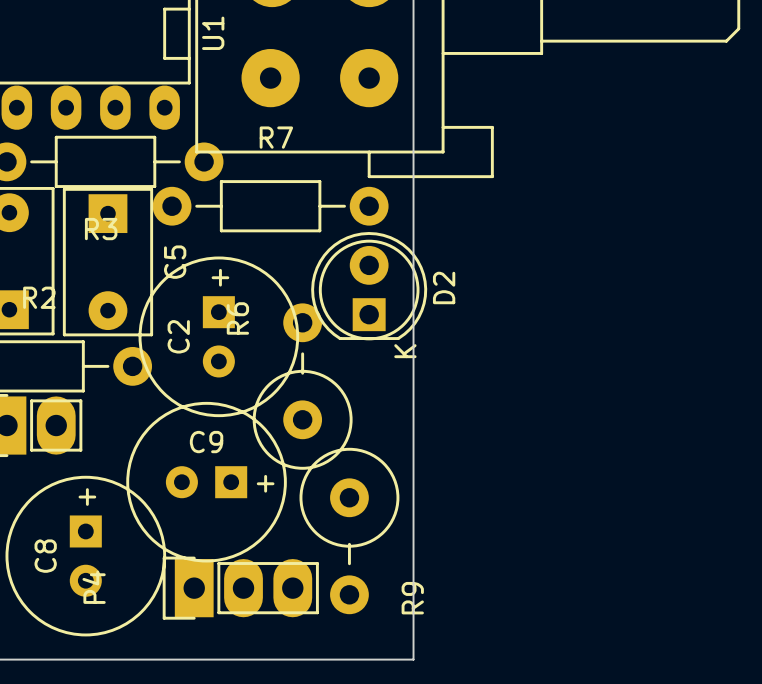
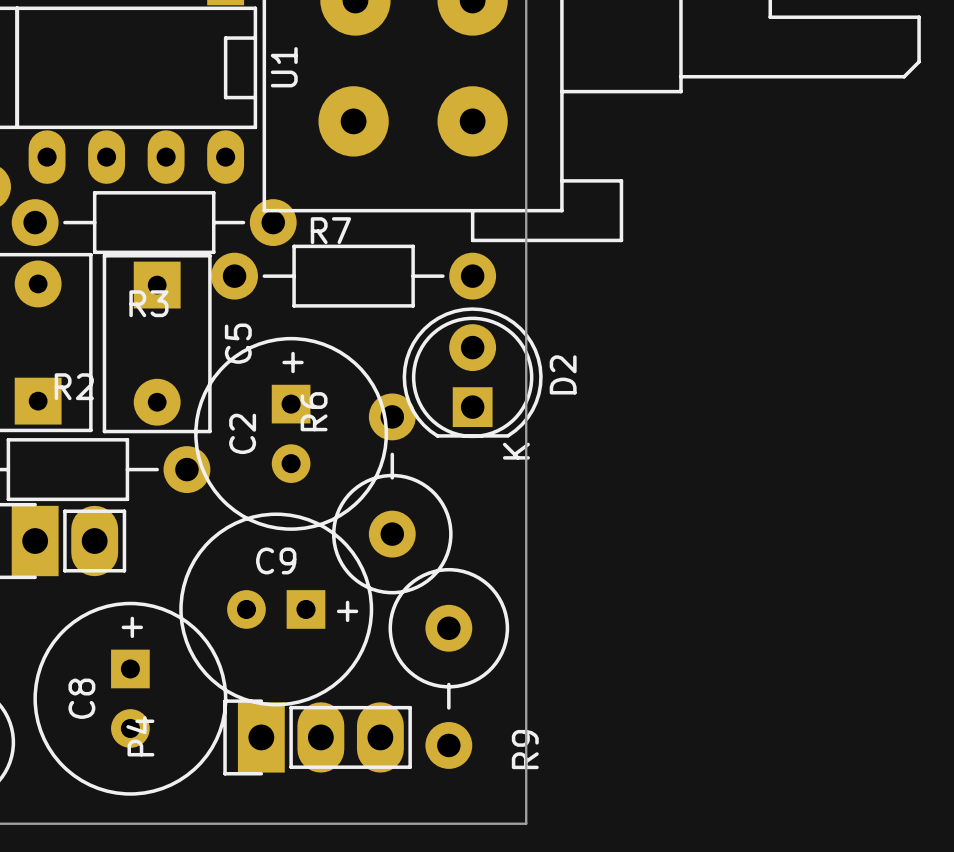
R7 name position: R7 (276, 137) -> R7 (330, 230)

